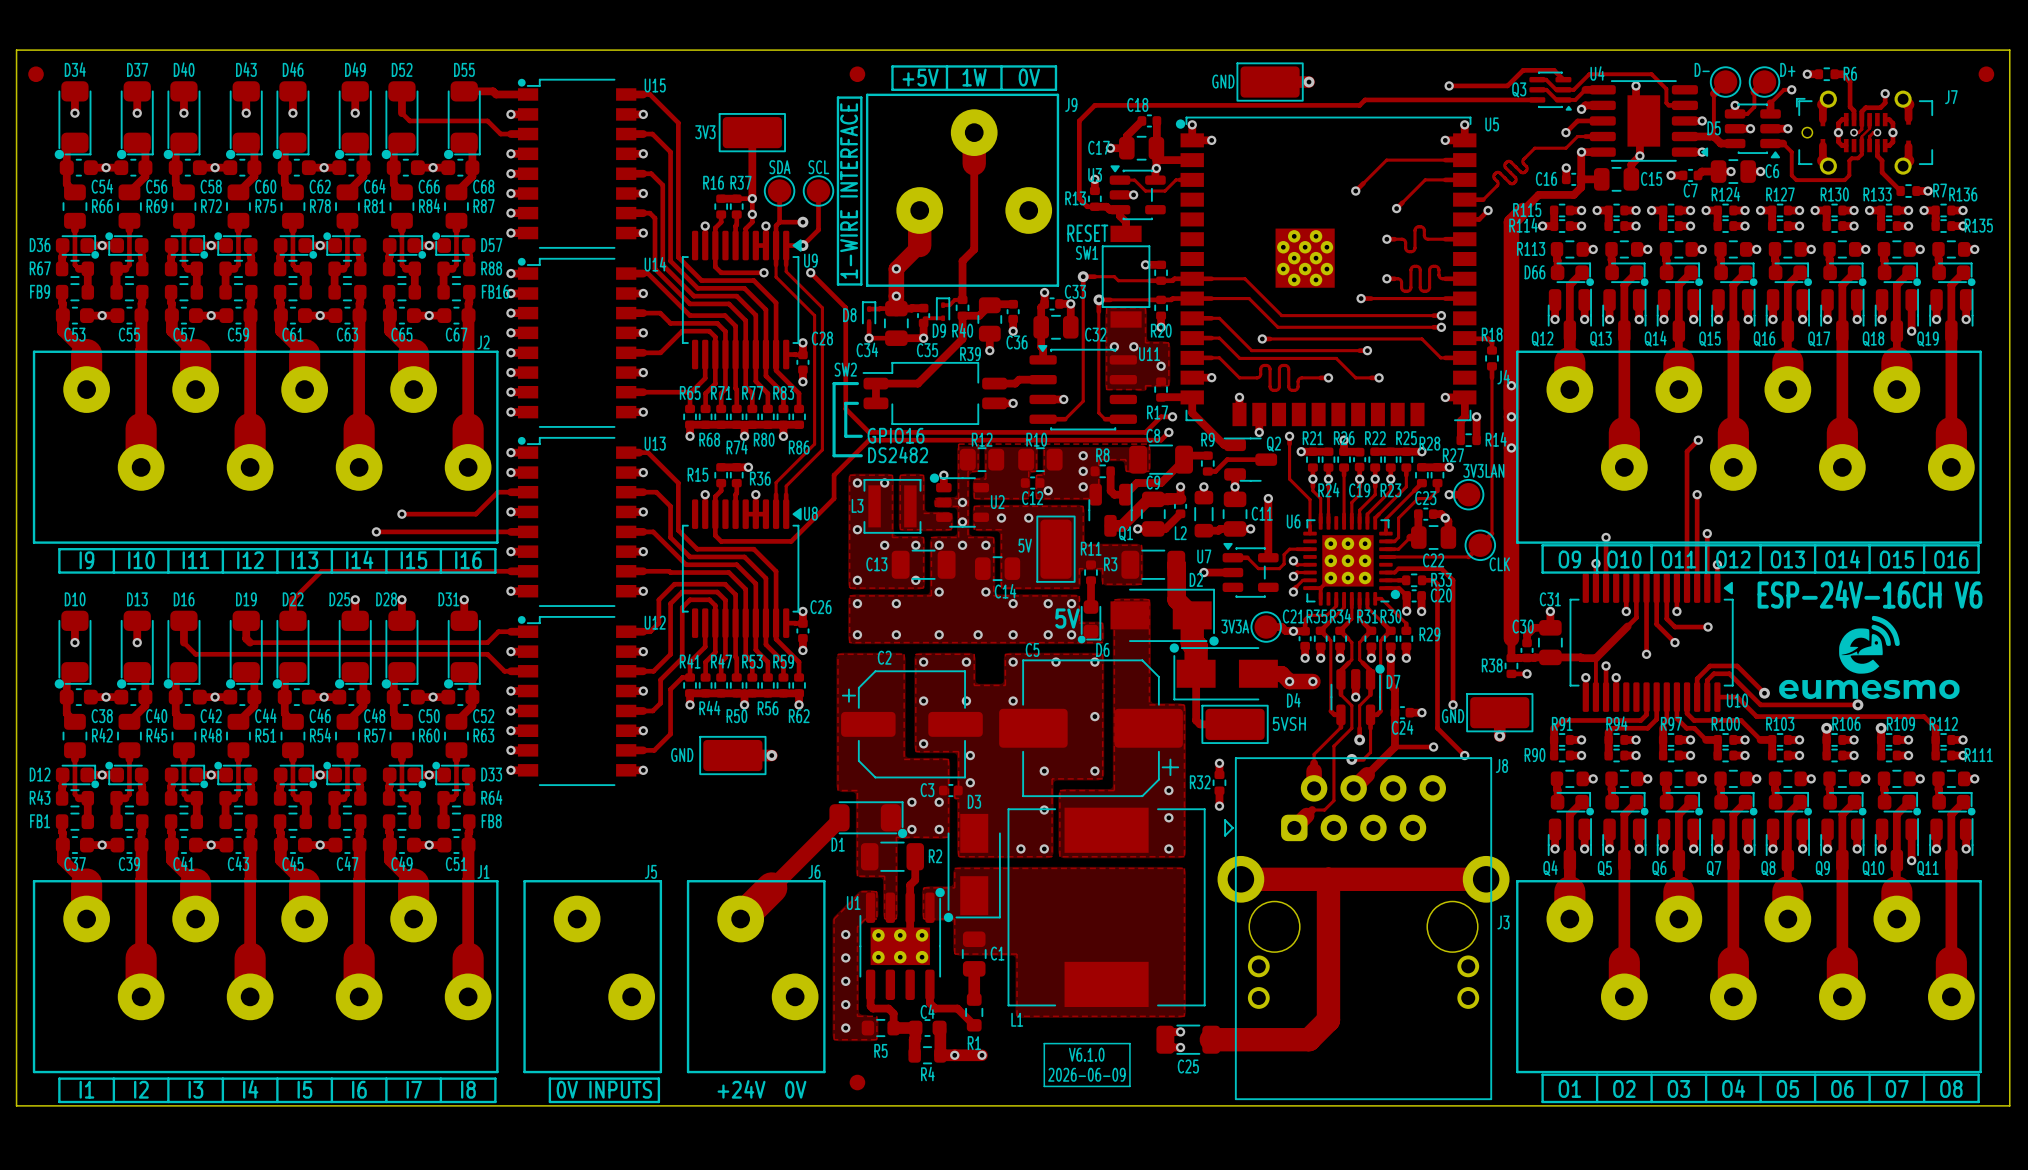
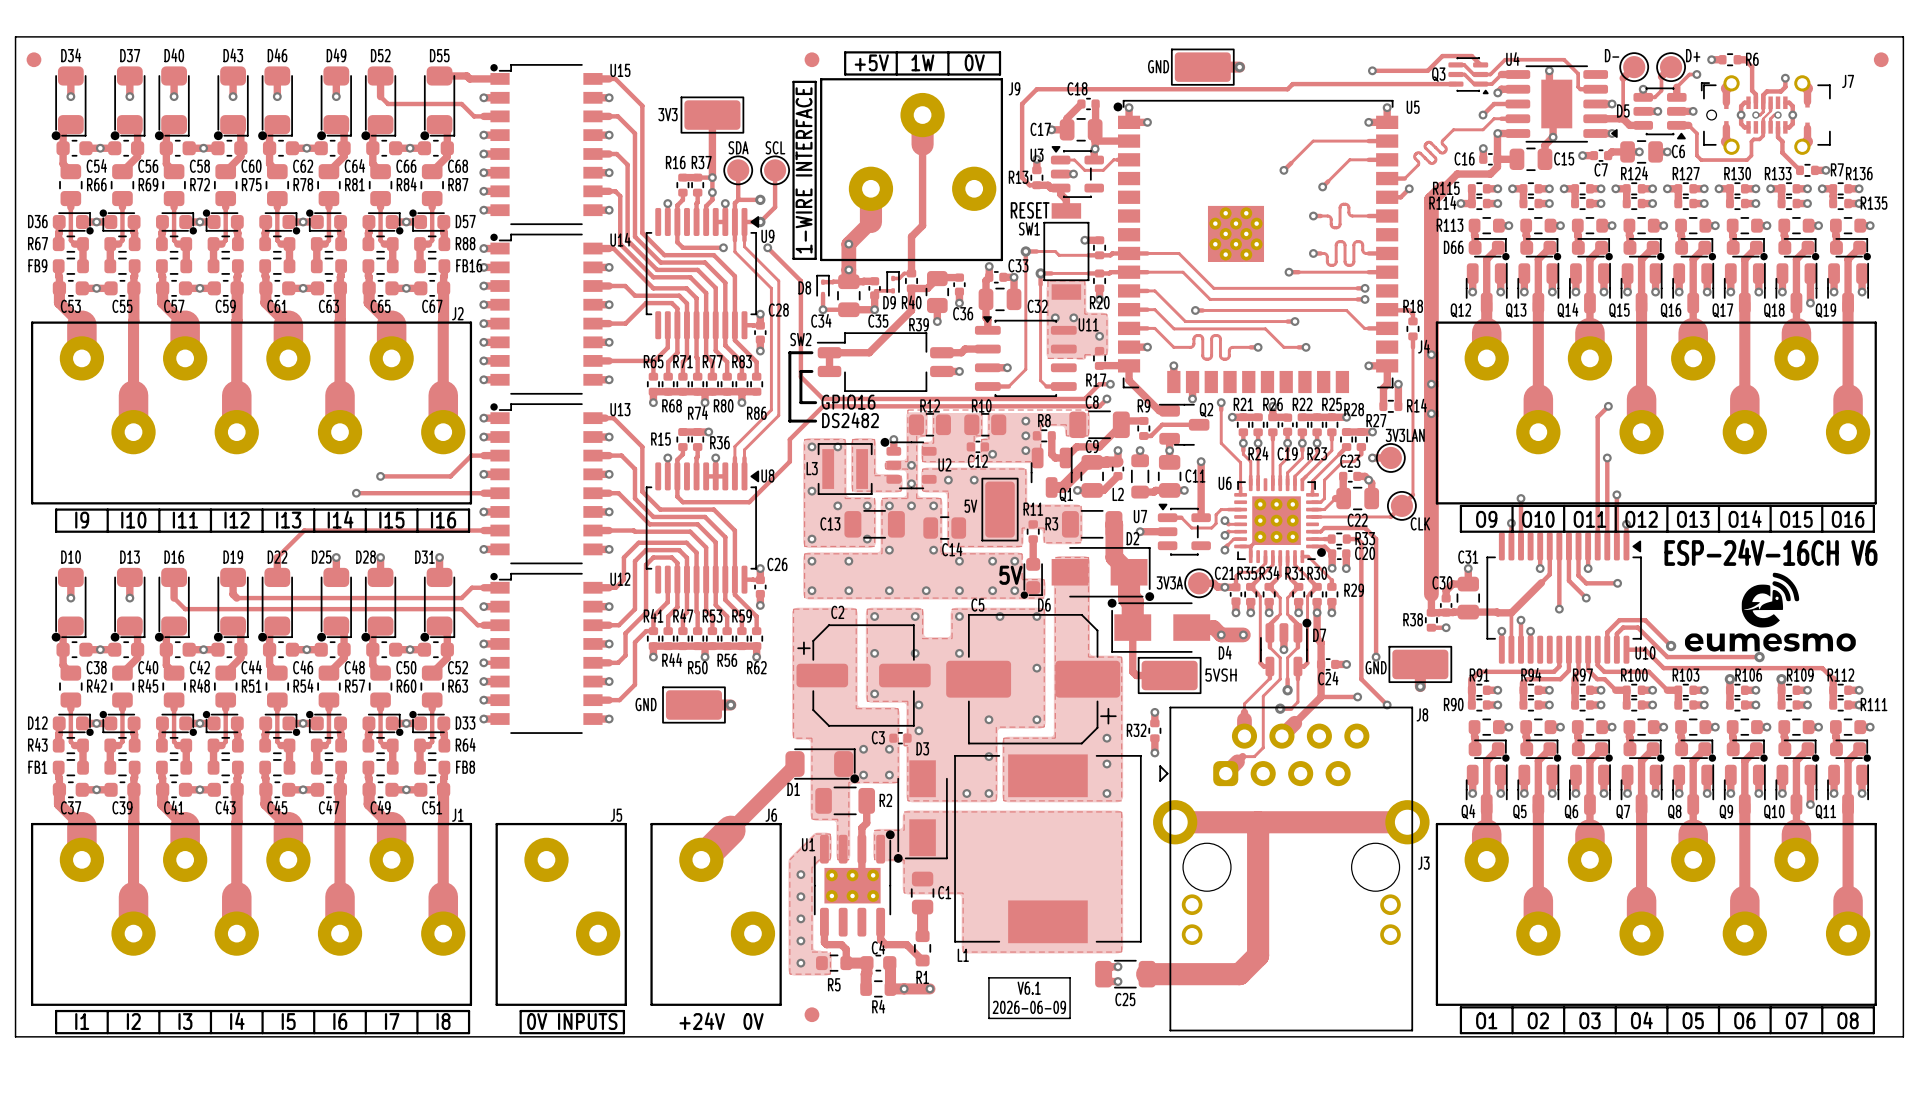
text: V6.1.0 (1086, 1054) -> V6.1 (1029, 988)

